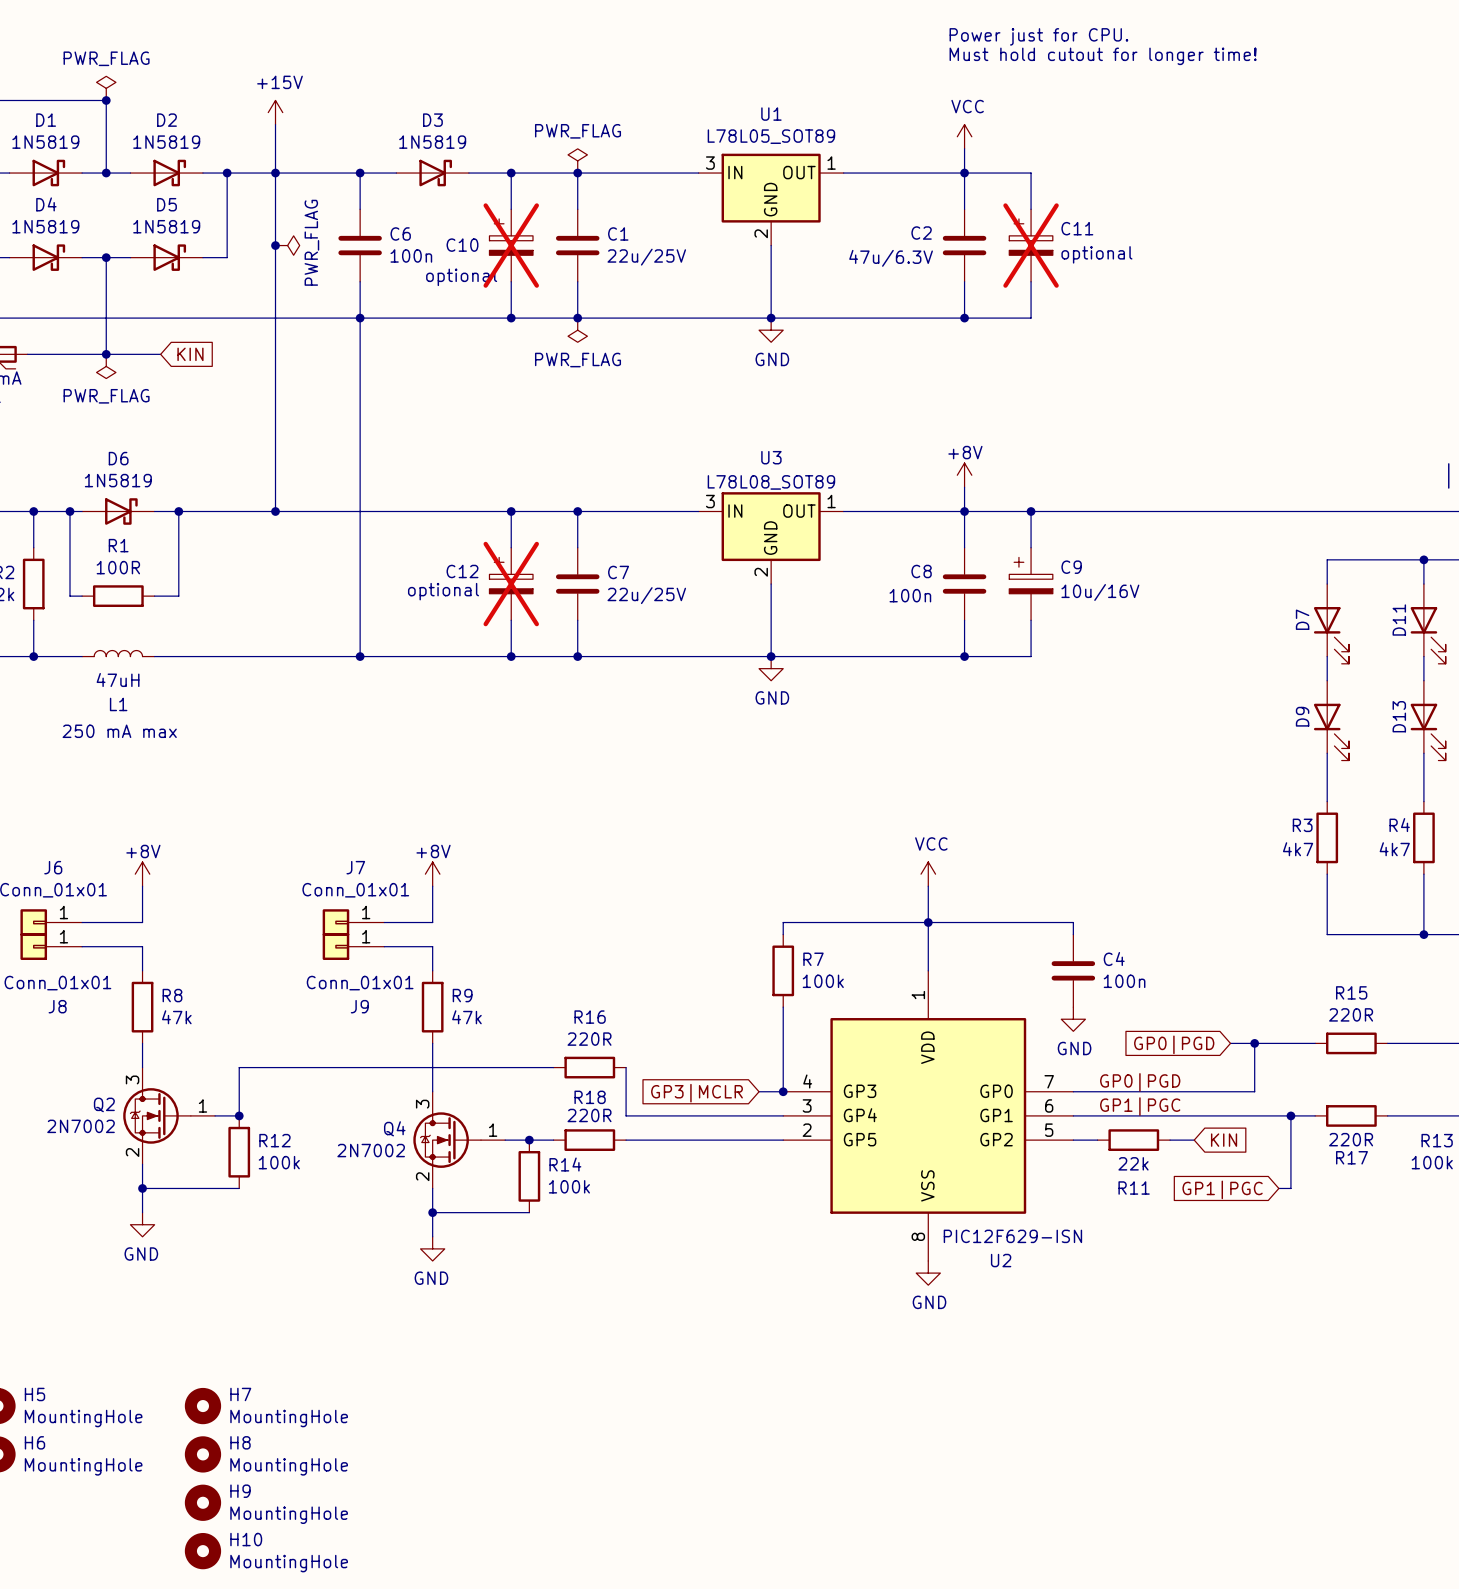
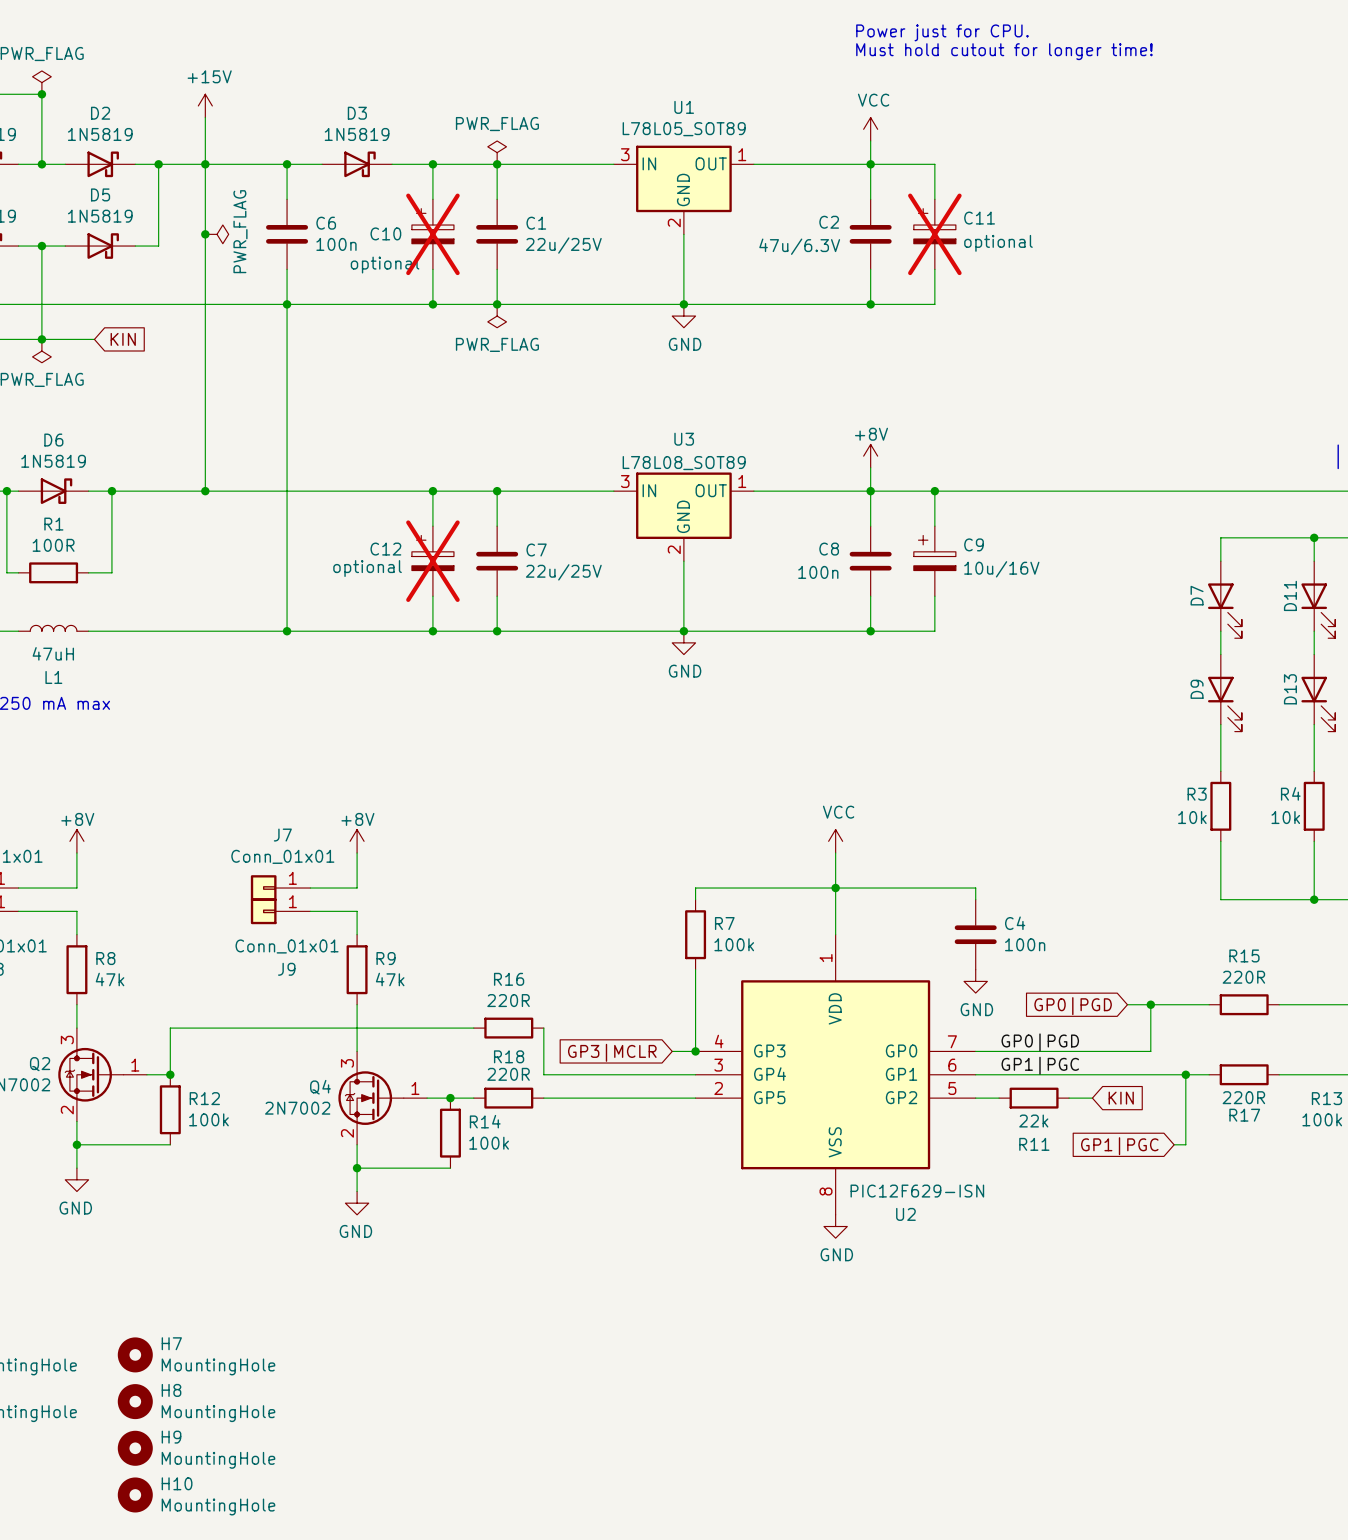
R3 value: 4k7 (1298, 849) -> 10k (1192, 817)
R4 value: 4k7 (1394, 849) -> 10k (1285, 817)

